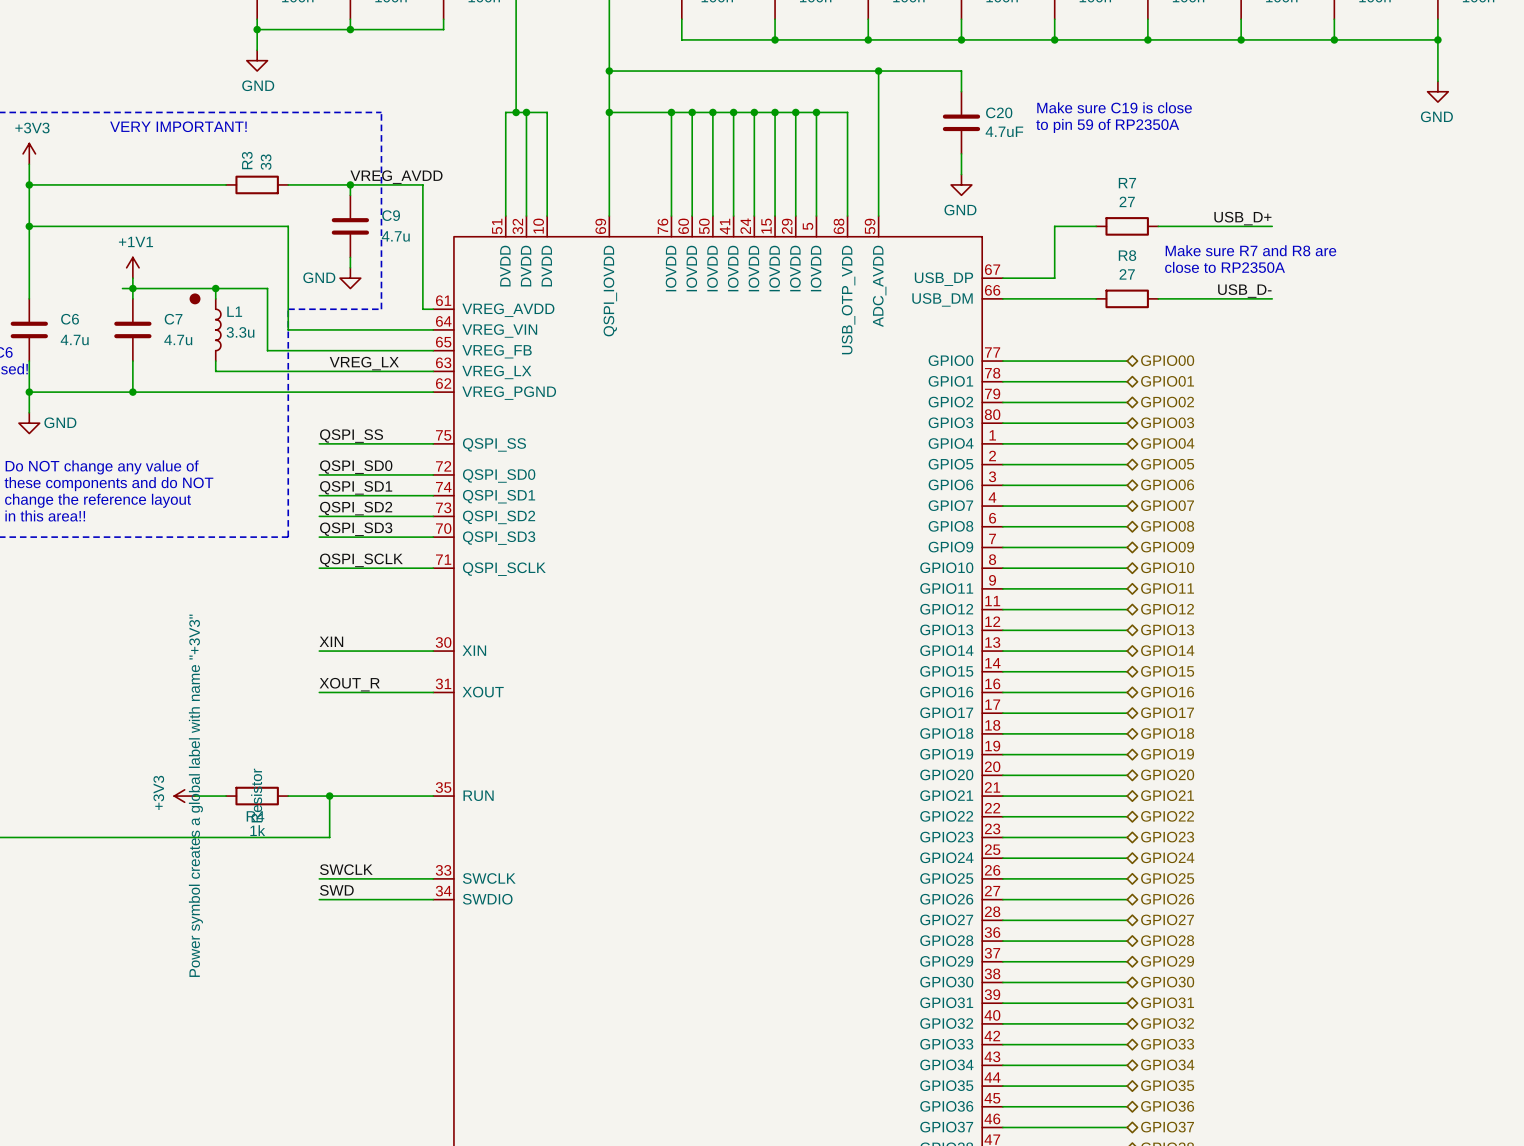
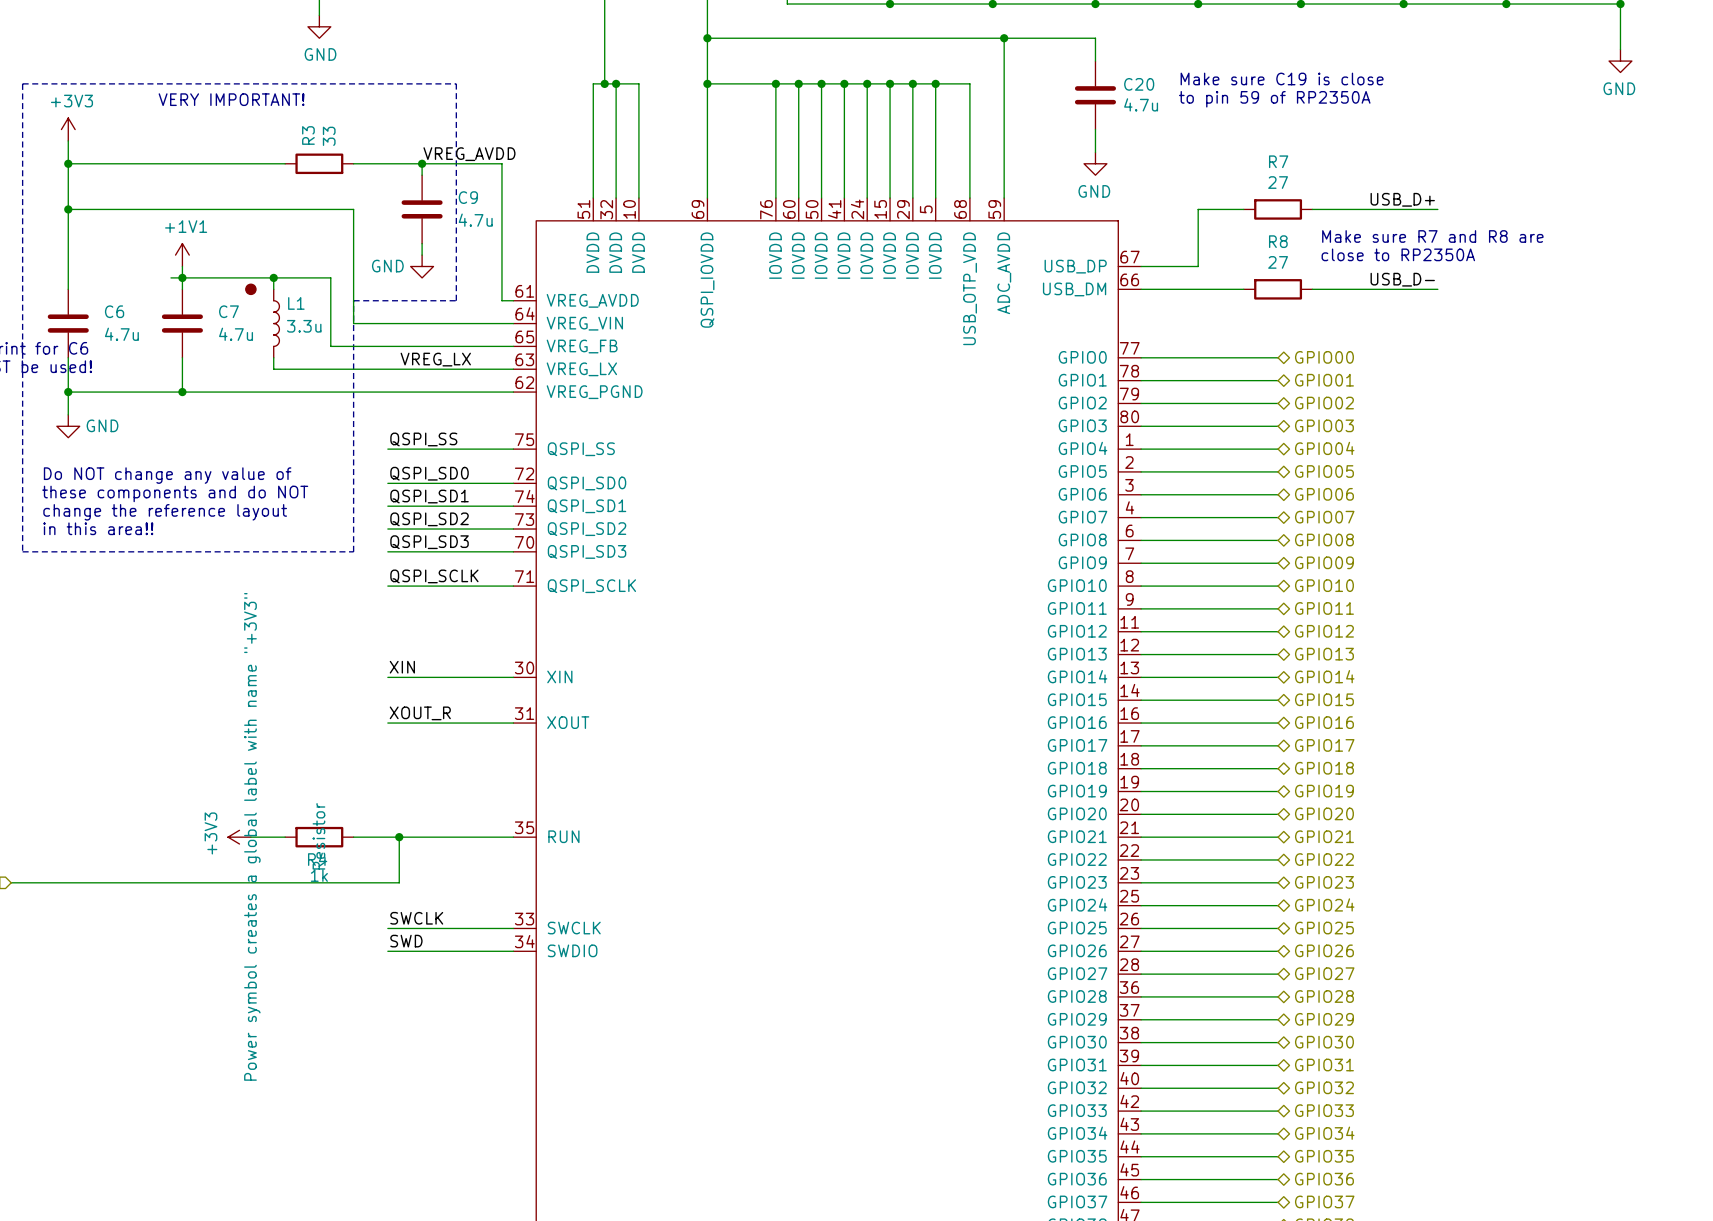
C20 value: 4.7uF (1004, 131) -> 4.7u (1141, 104)

